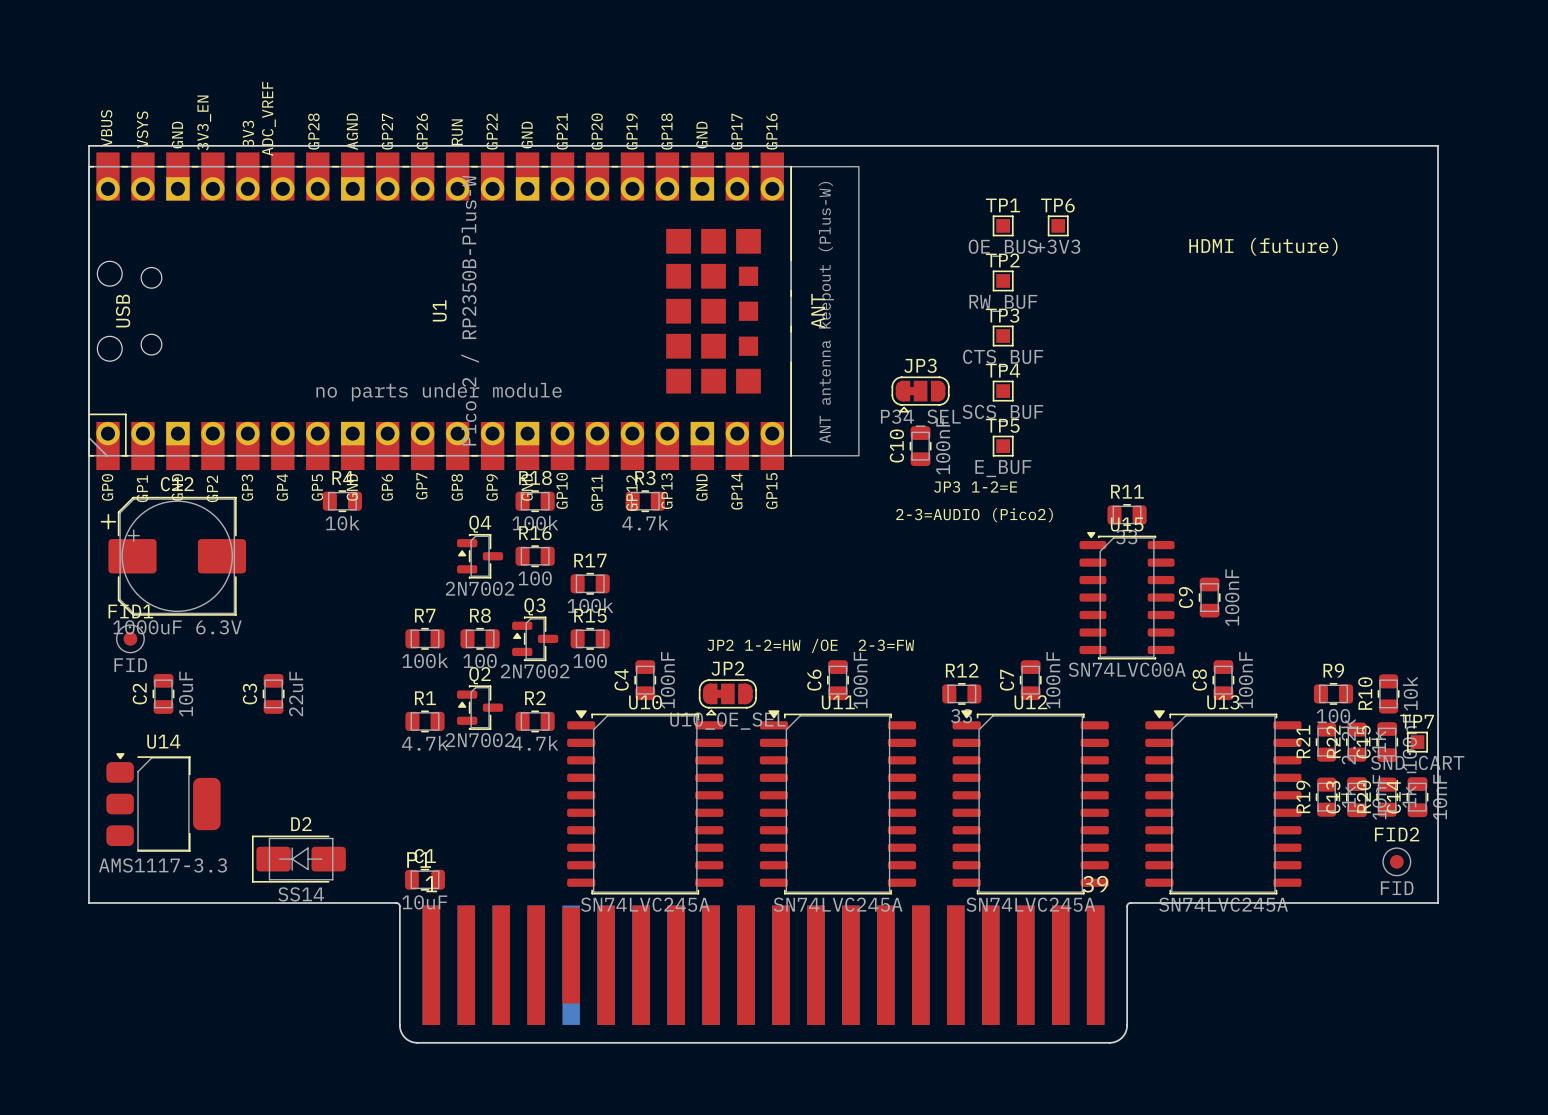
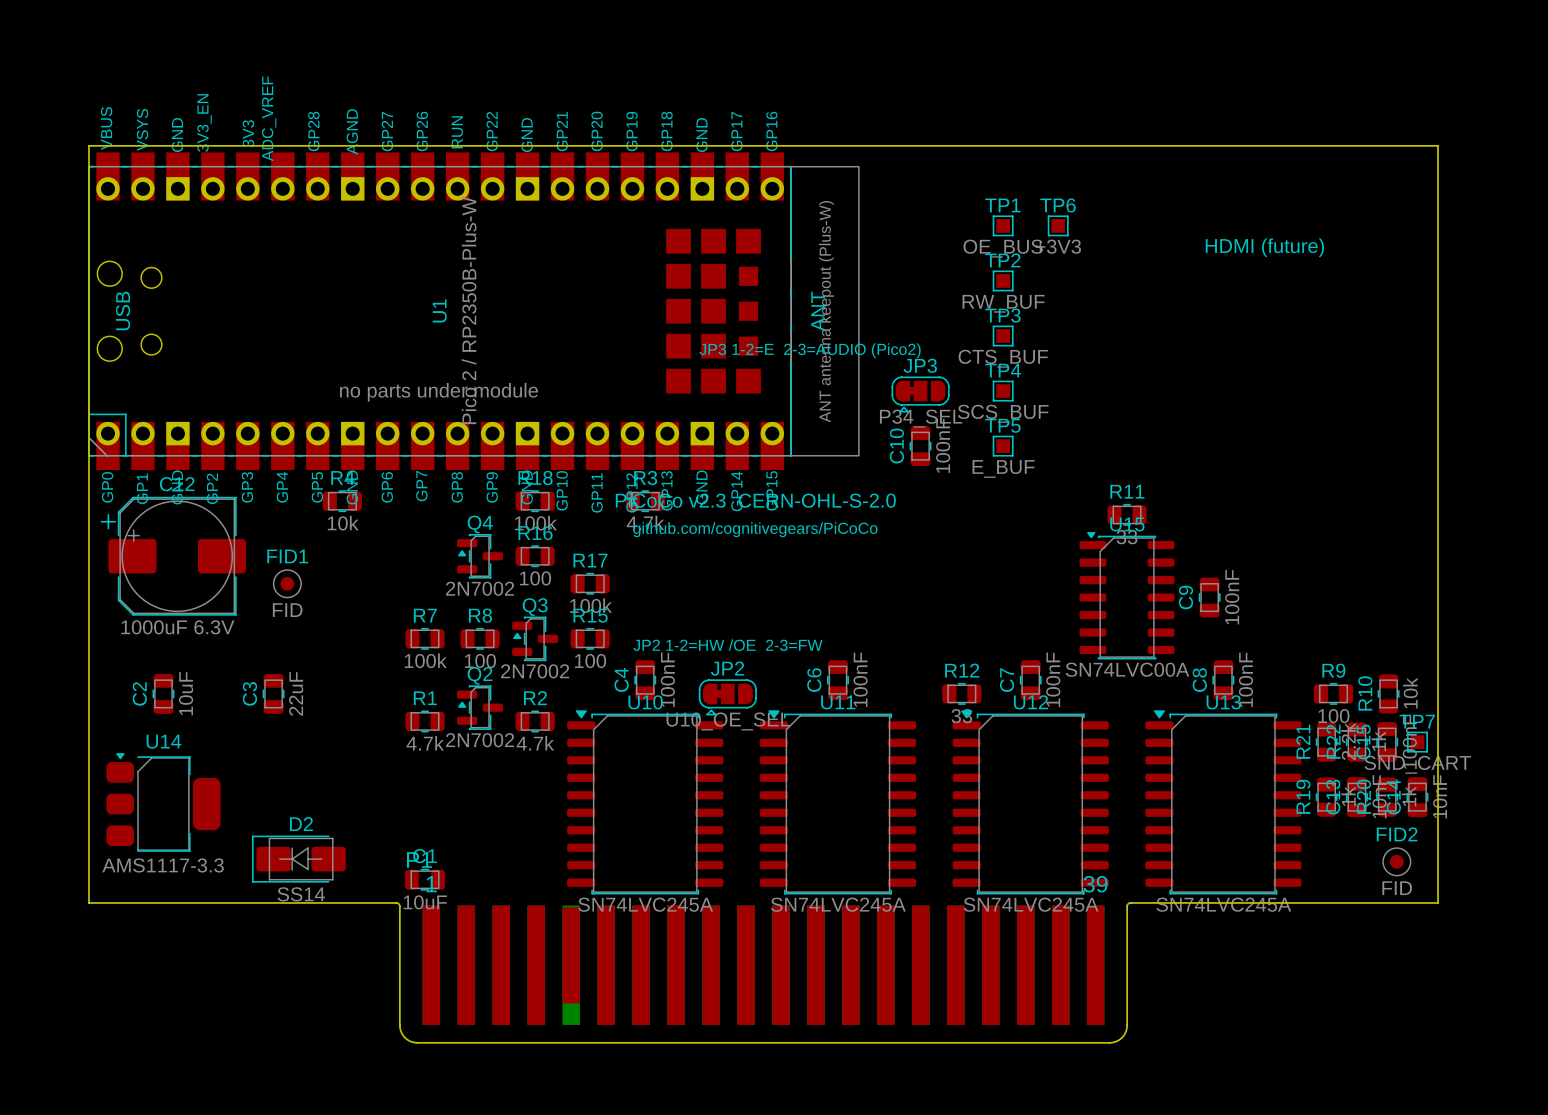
text: none -> JP3 1-2=E 2-3=AUDIO (Pico2) (810, 350)
text: JP3 1-2=E (975, 487) -> none
text: none -> PiCoCo v2.3 CERN-OHL-S-2.0 (755, 500)
text: 2-3=AUDIO (Pico2) (974, 515) -> none
text: none -> github.com/cognitivegears/PiCoCo (755, 529)
FID1 position: (130, 638) -> (287, 583)
text position: JP2 1-2=HW /OE 2-3=FW (810, 645) -> JP2 1-2=HW /OE 2-3=FW (727, 645)

